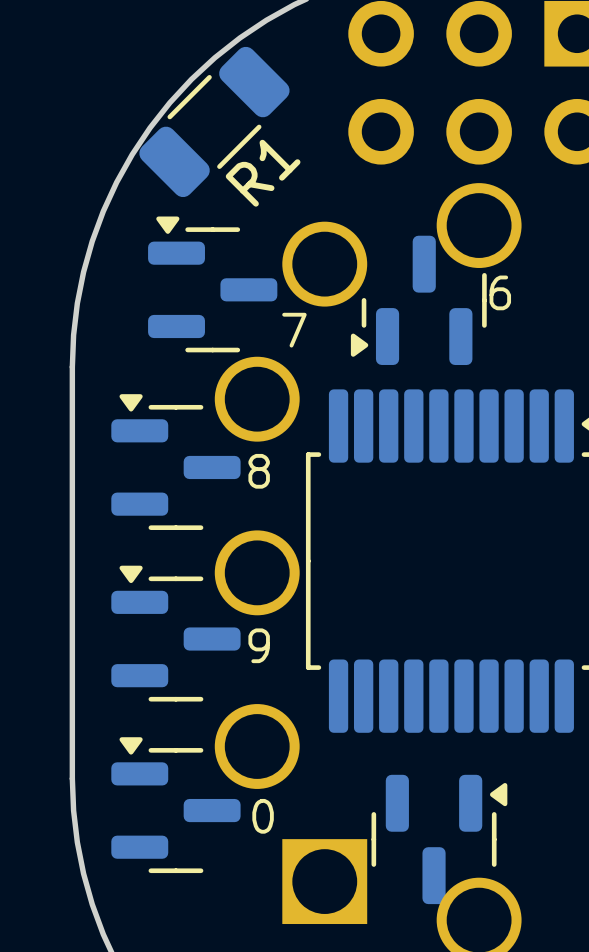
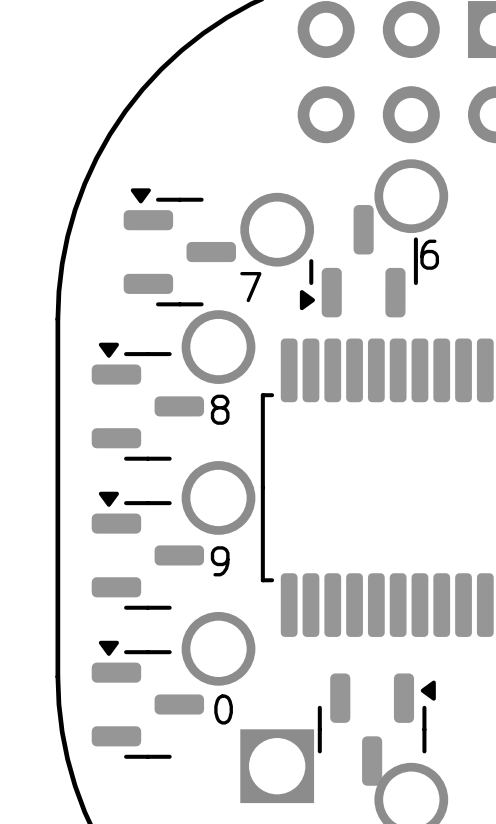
R1: (214, 121) -> none

